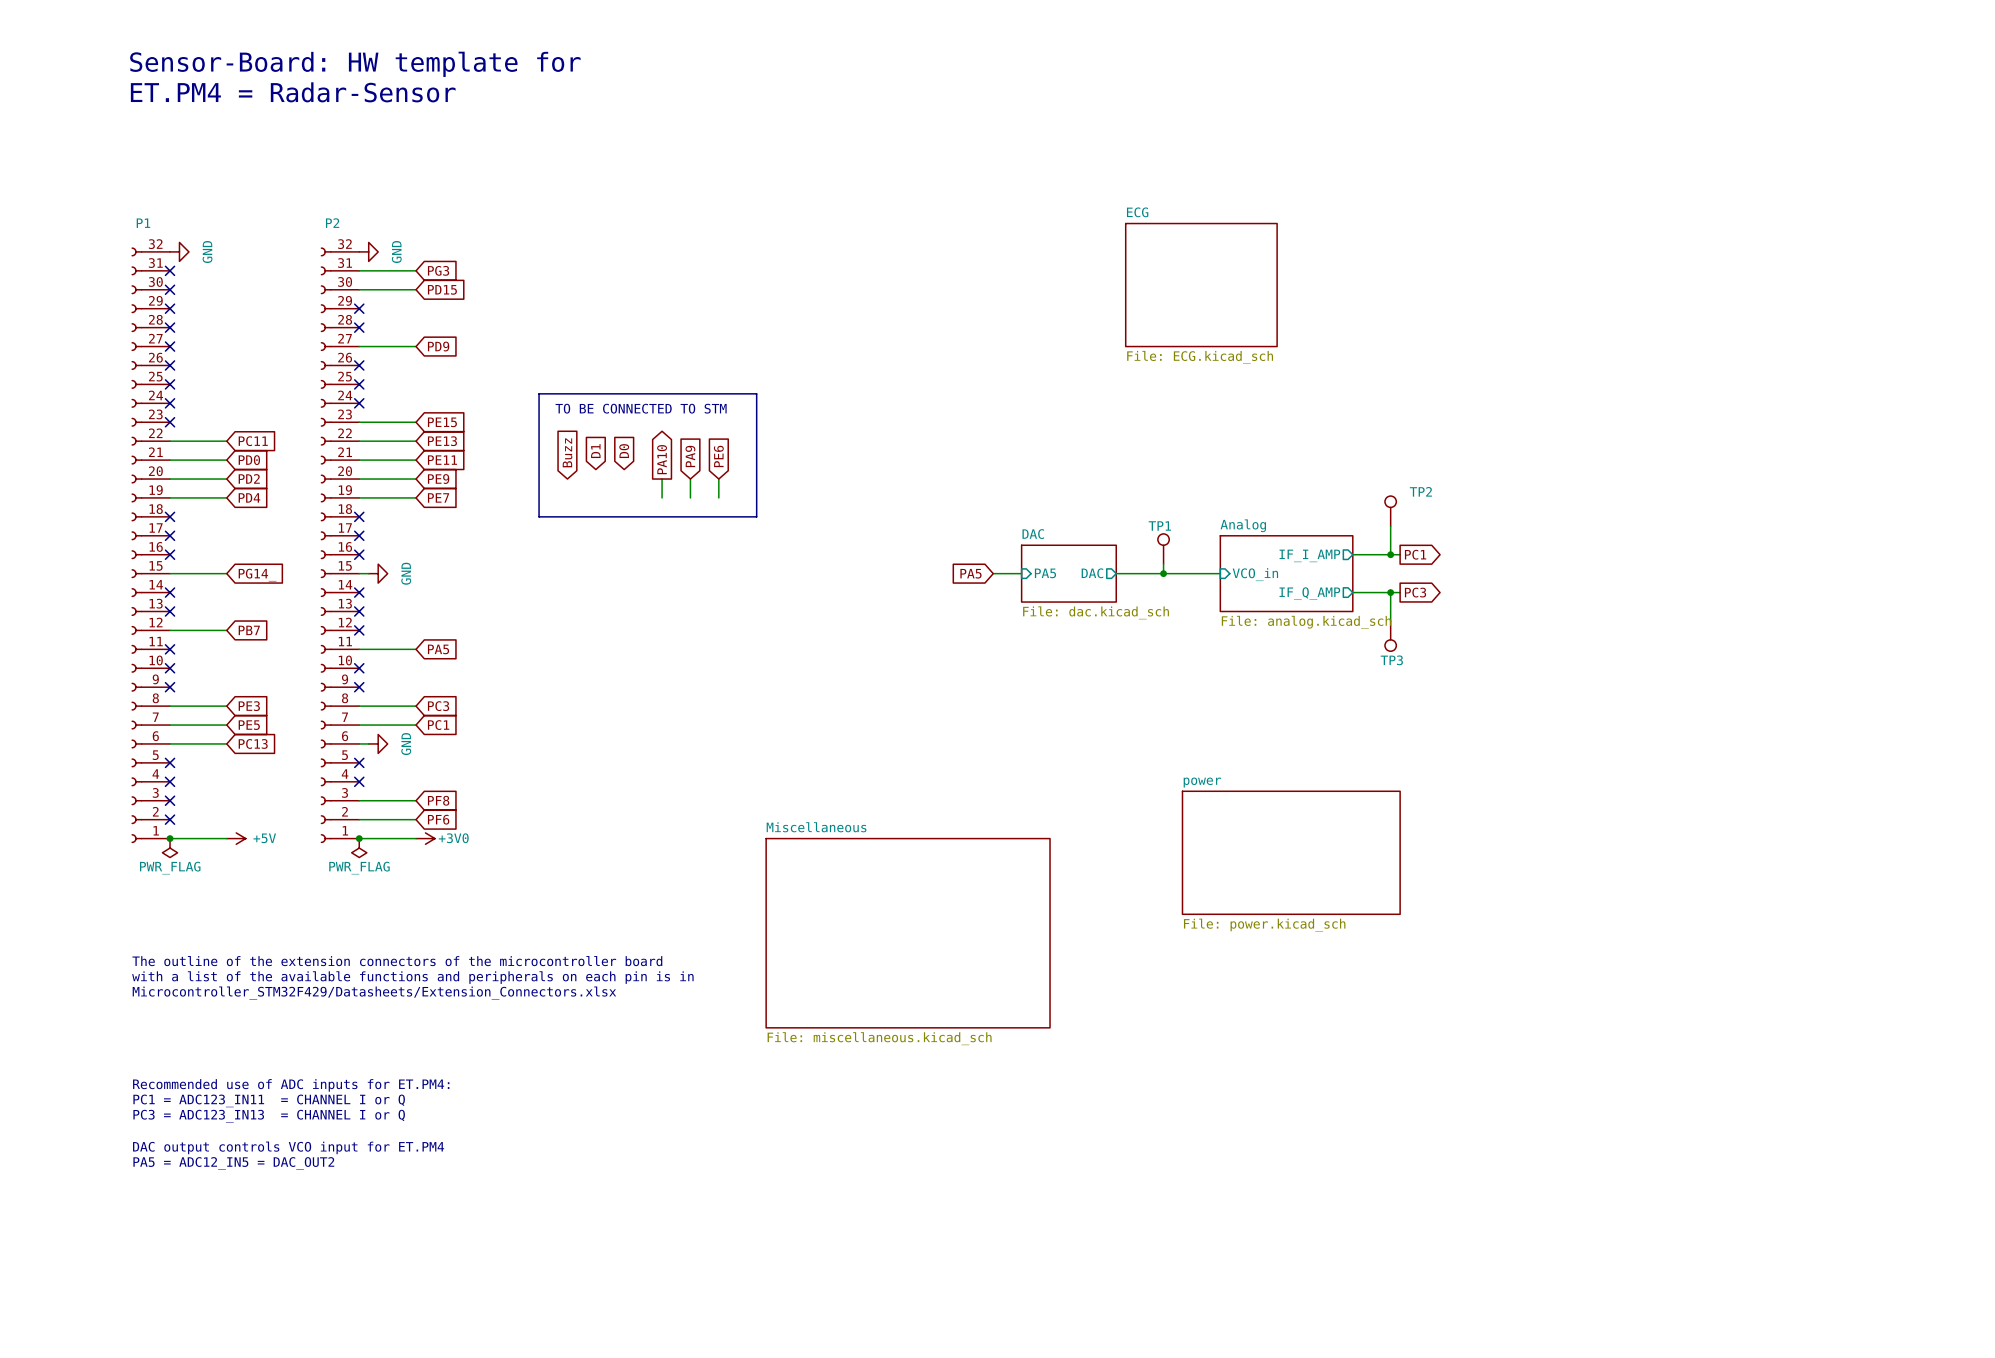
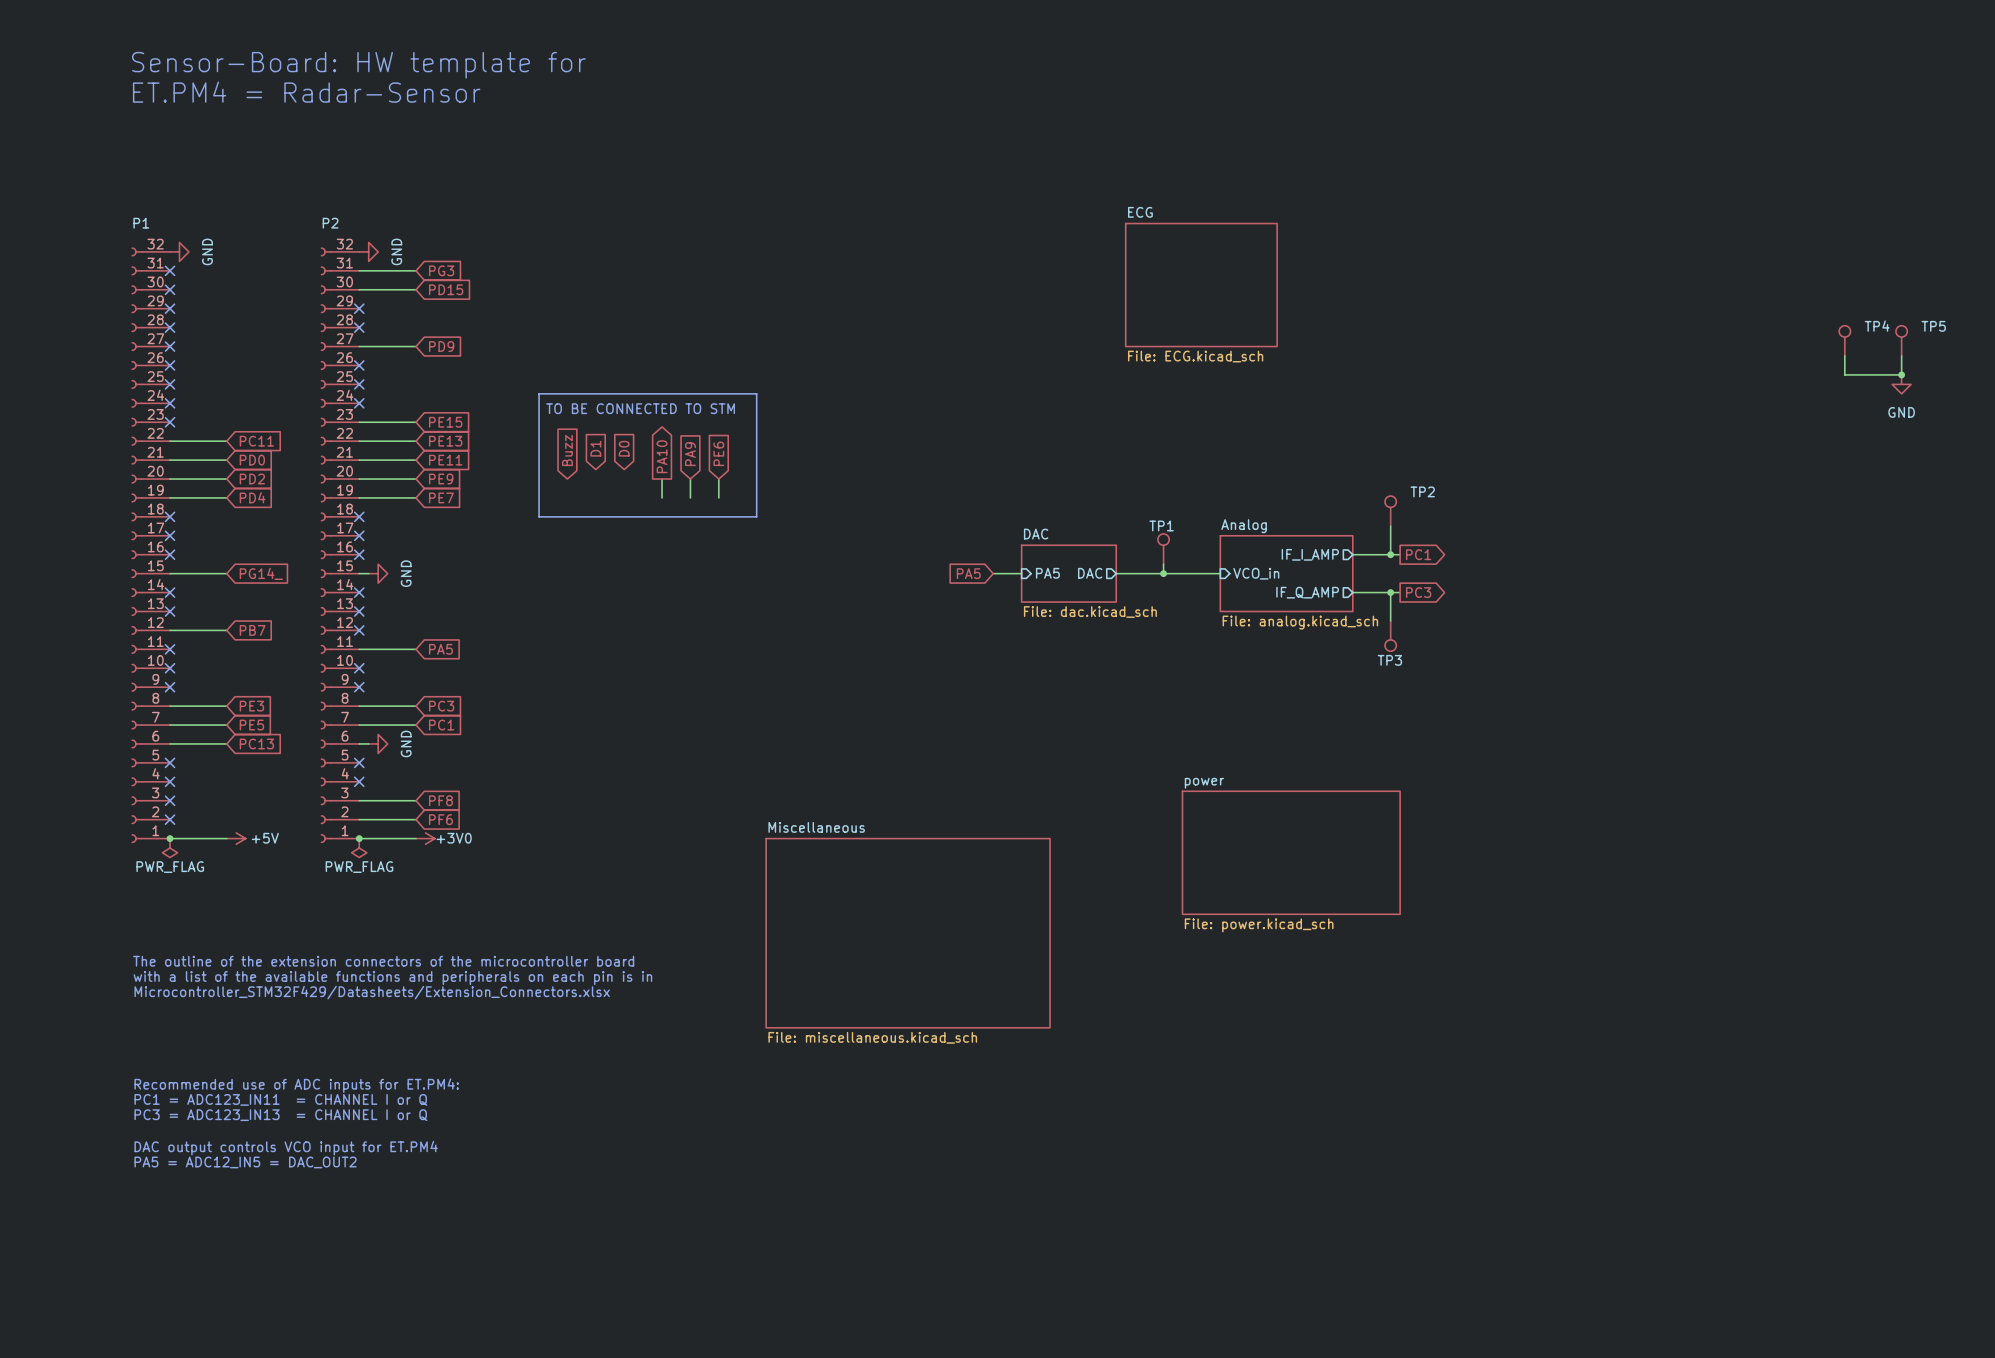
TP4: none -> (1844, 340)
TP5: none -> (1901, 340)
wire: none -> (1844, 356) (1844, 374) (1901, 374) (1901, 356)
junction: none -> (1901, 374)
power symbol: none -> GND (1901, 384)

